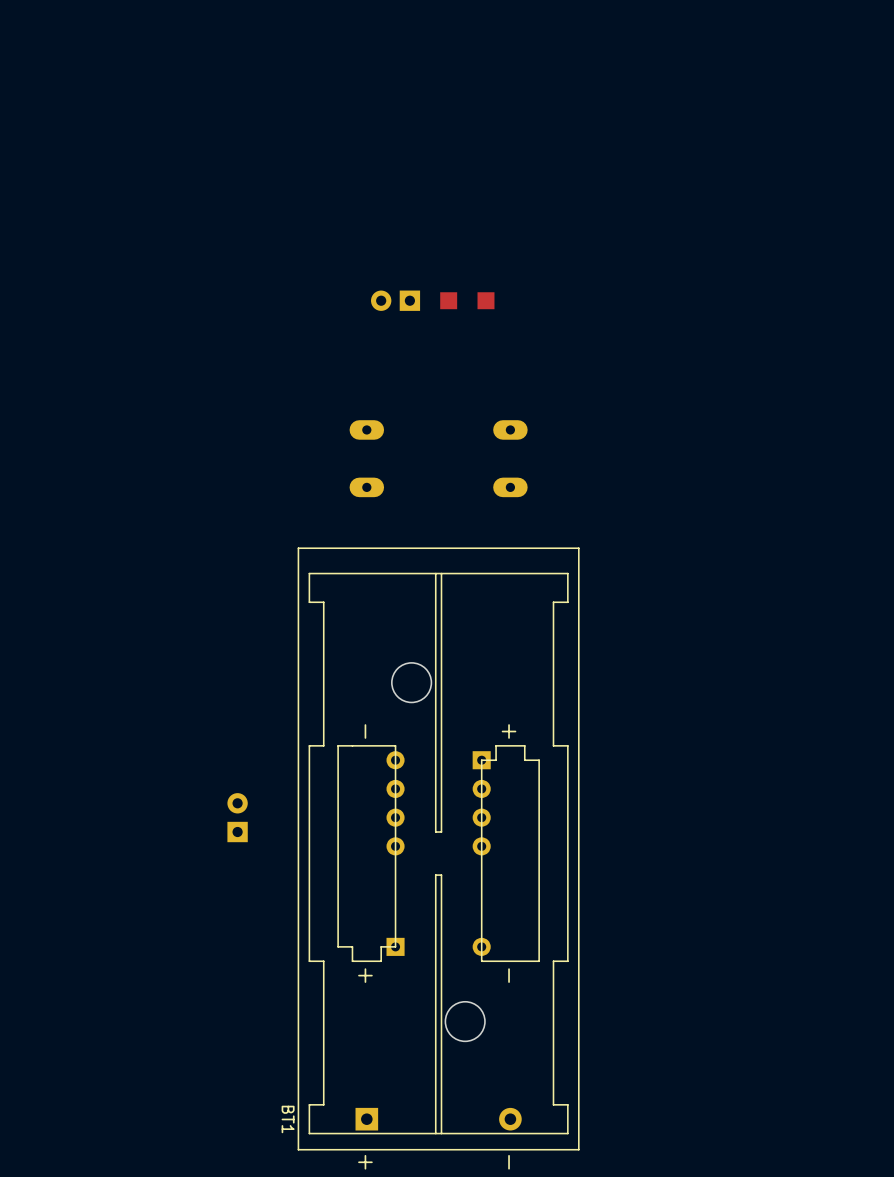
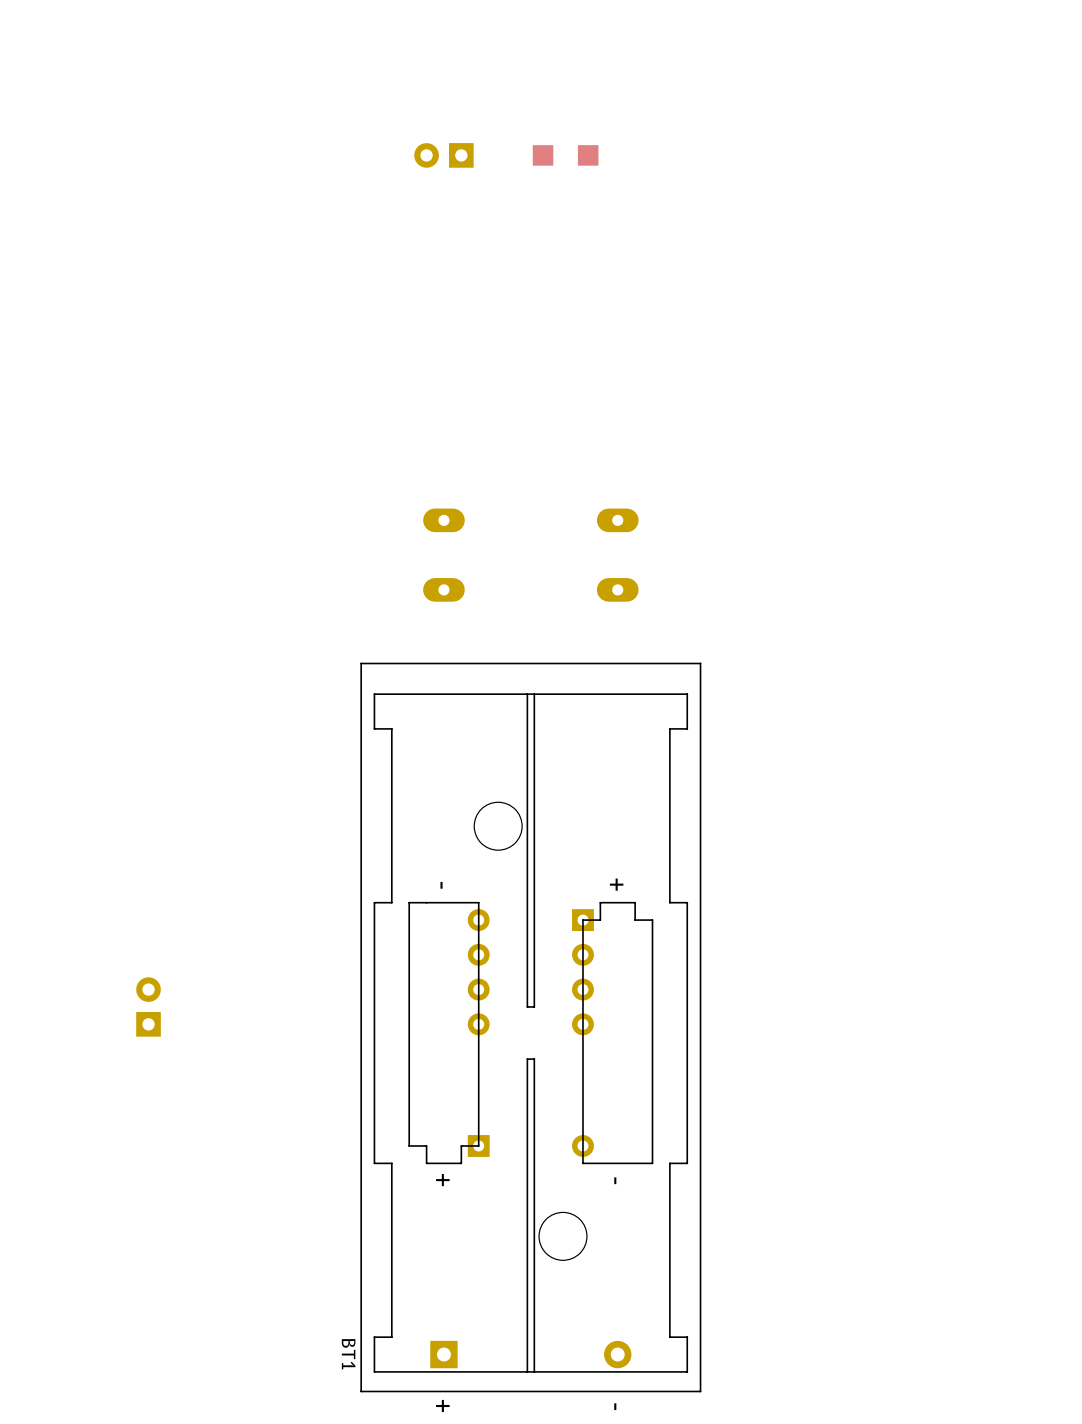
part position: (395, 300) -> (443, 155)
part position: (467, 300) -> (565, 155)
part position: (237, 817) -> (148, 1006)

